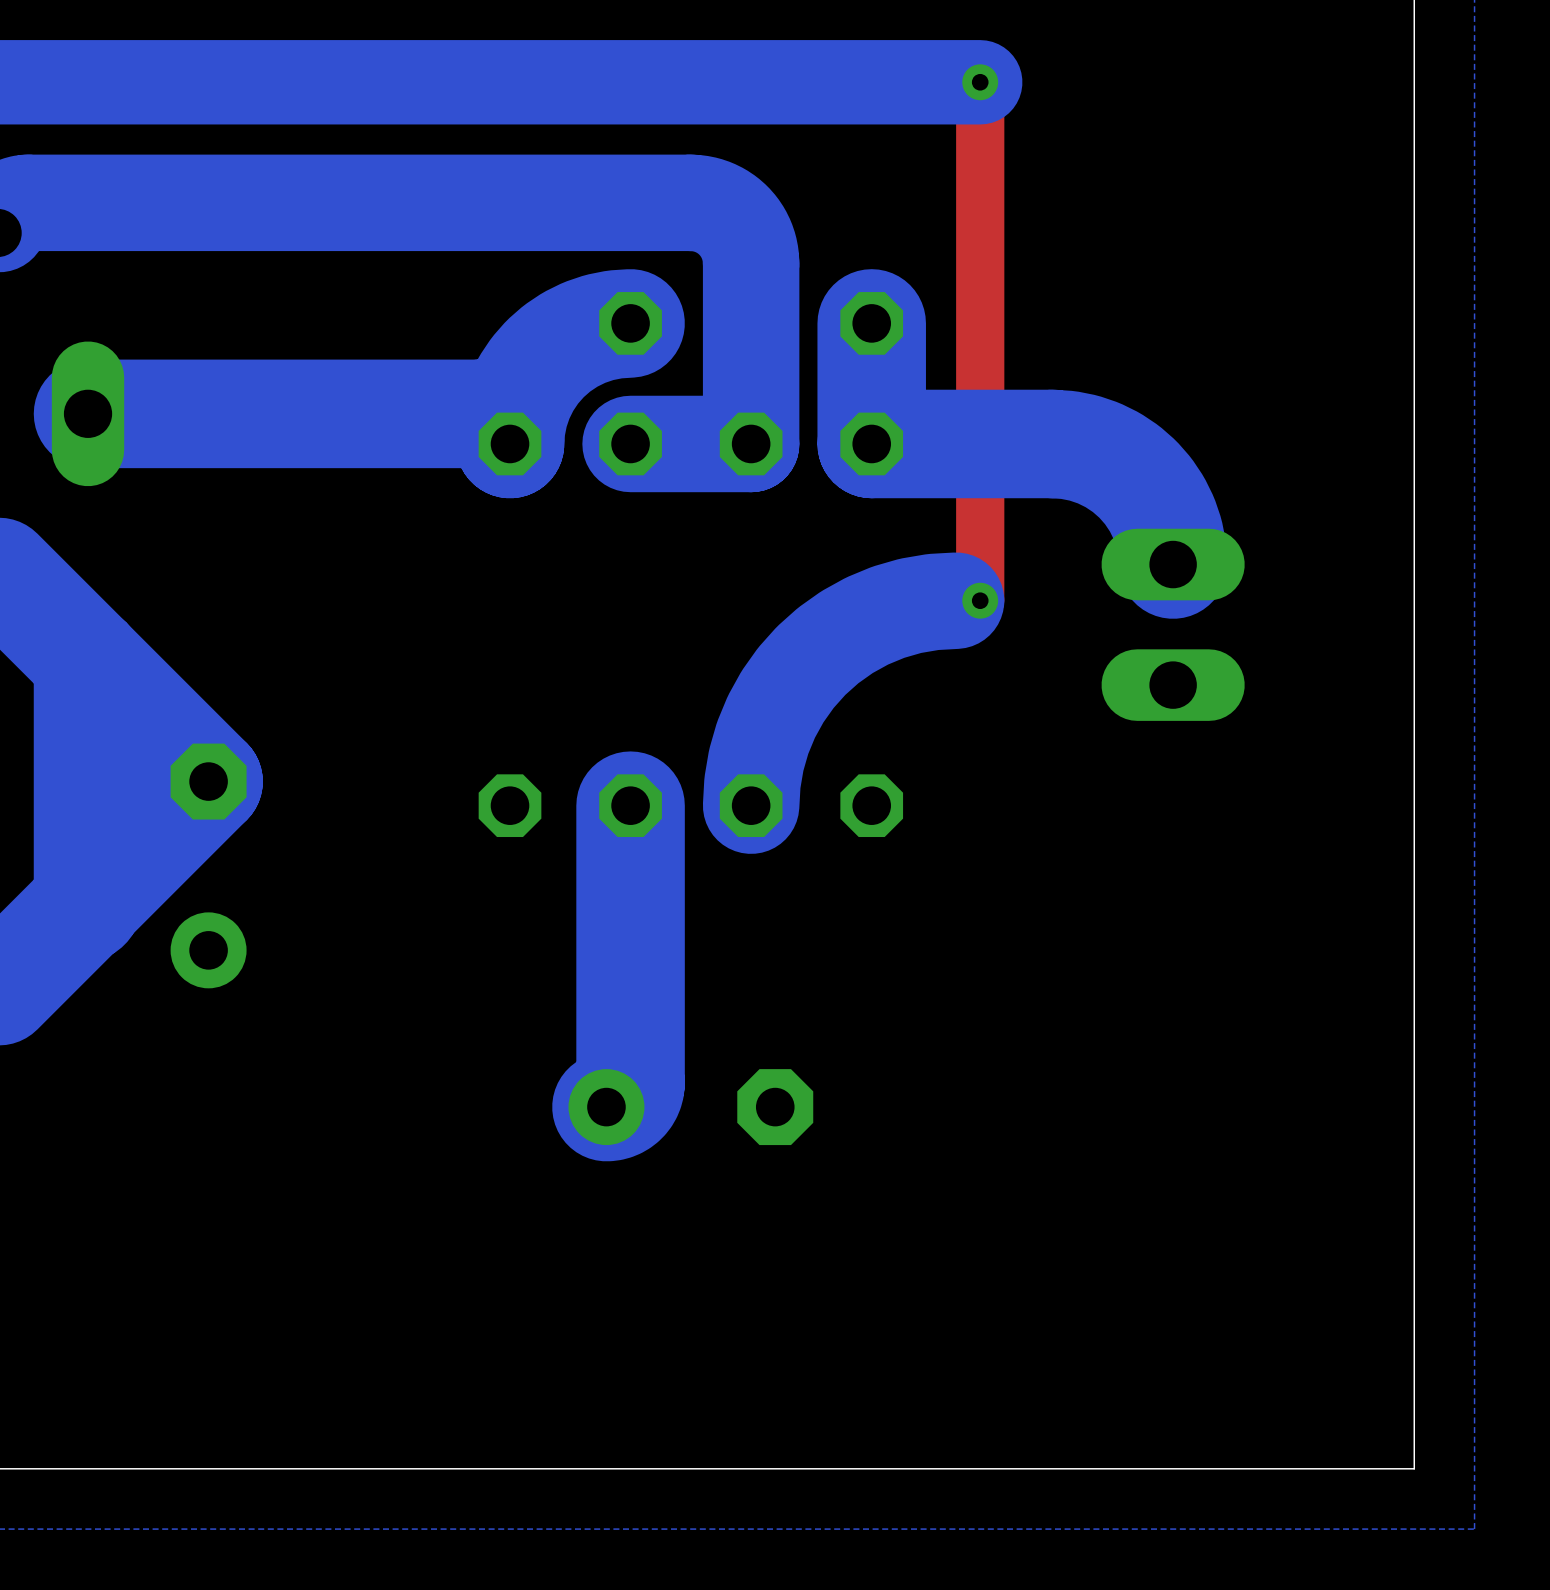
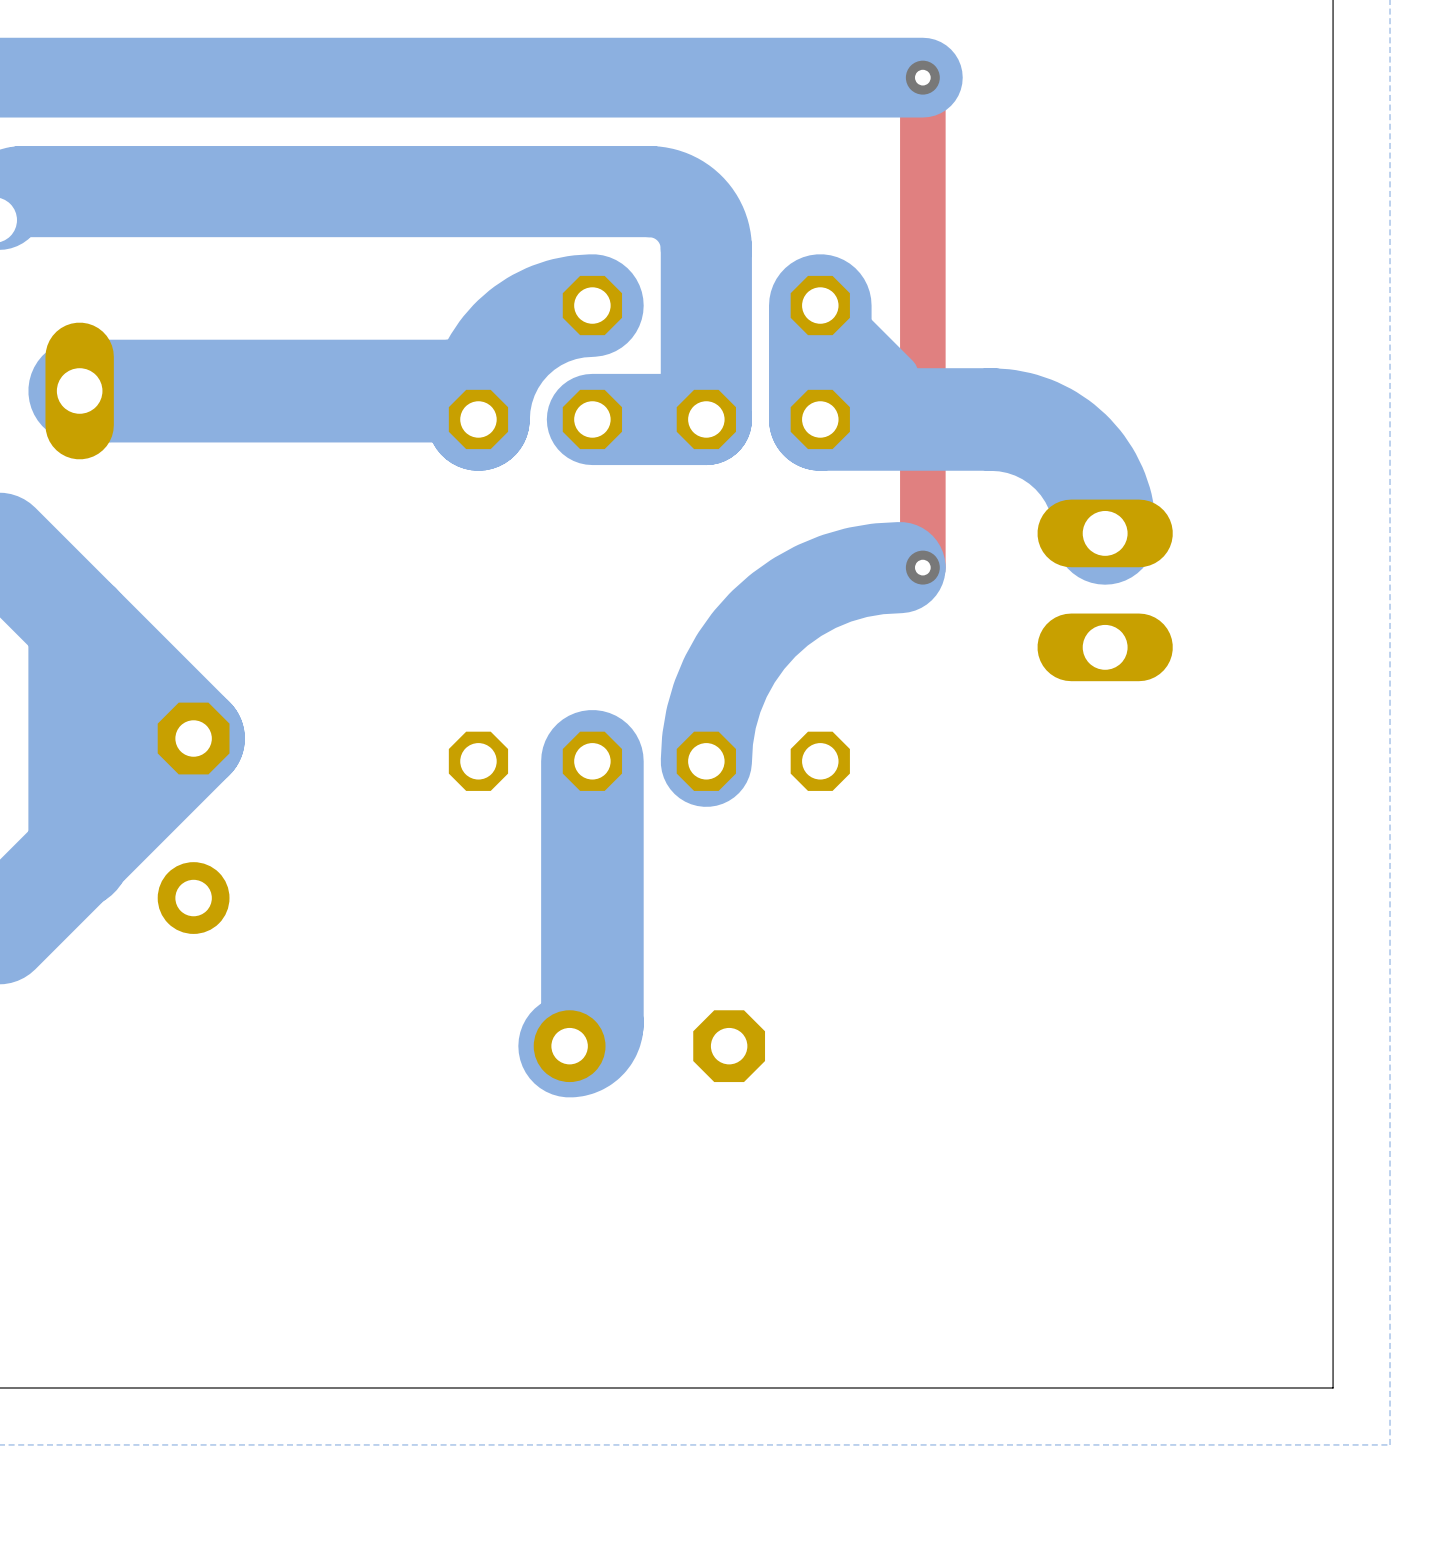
bottom track: none -> (820, 305) (831, 305) (900, 373)

